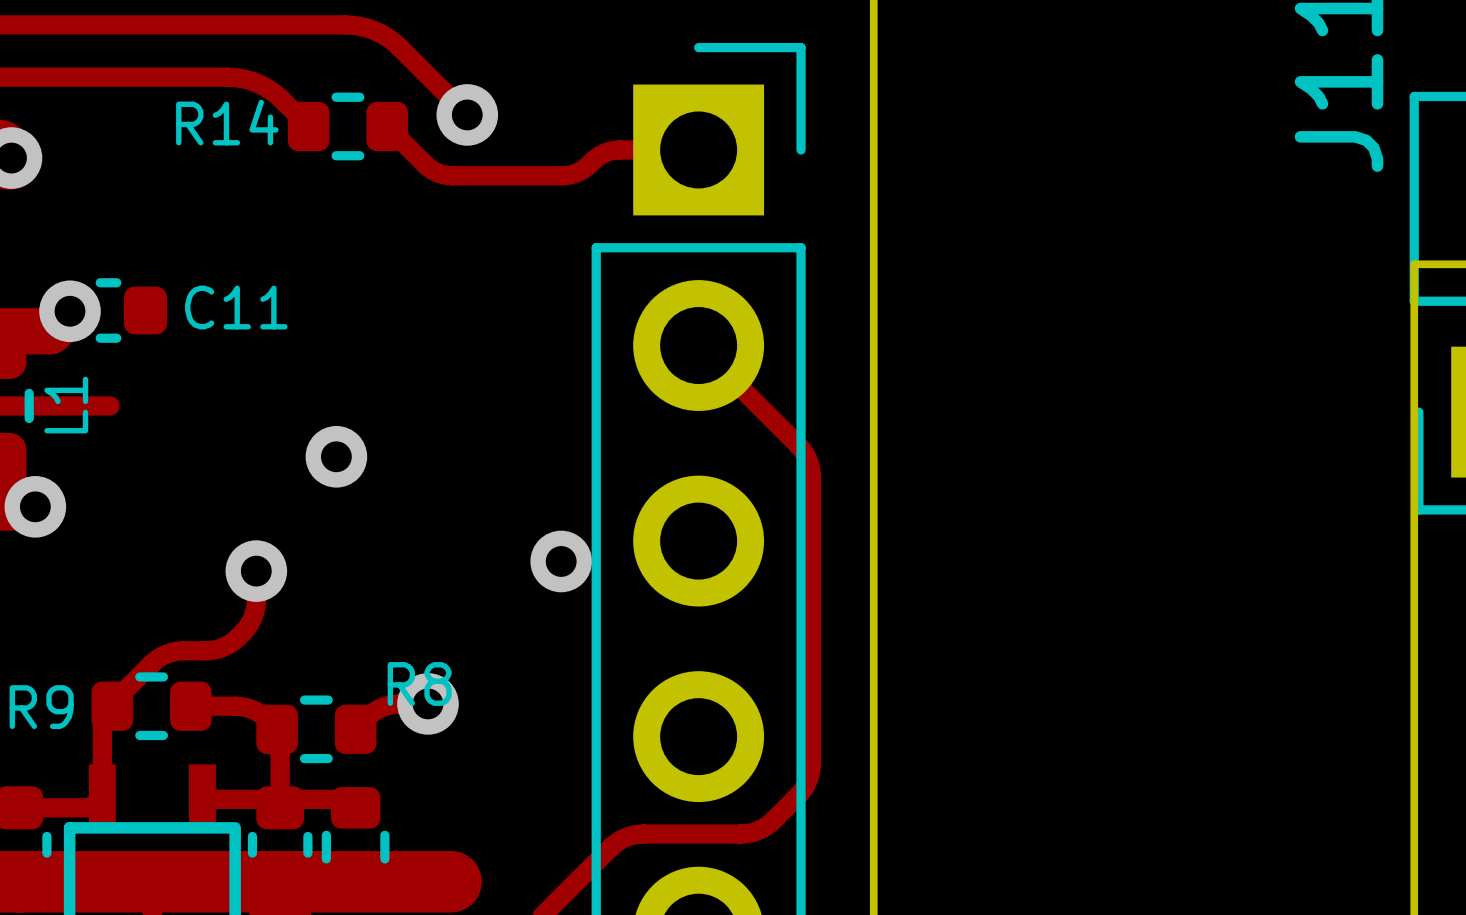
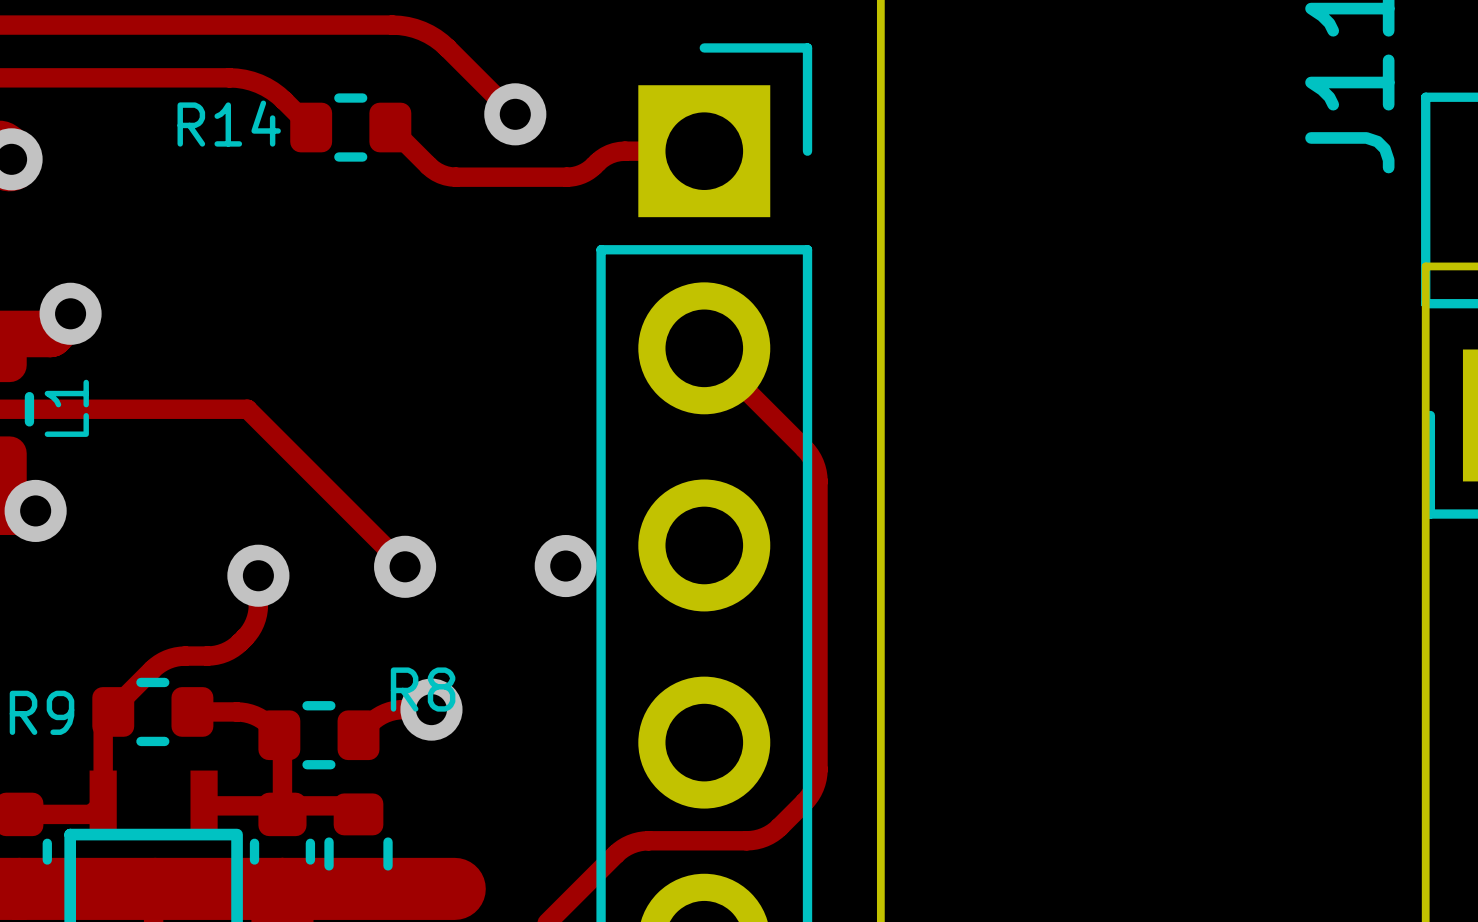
track: (345, 24) (367, 28) (388, 37) (467, 114) -> (348, 25) (399, 25) (428, 34) (447, 47) (514, 115)
via position: (467, 114) -> (515, 114)
C11: (108, 310) -> none
track: none -> (110, 409) (247, 409) (405, 566)
via position: (336, 456) -> (405, 566)

